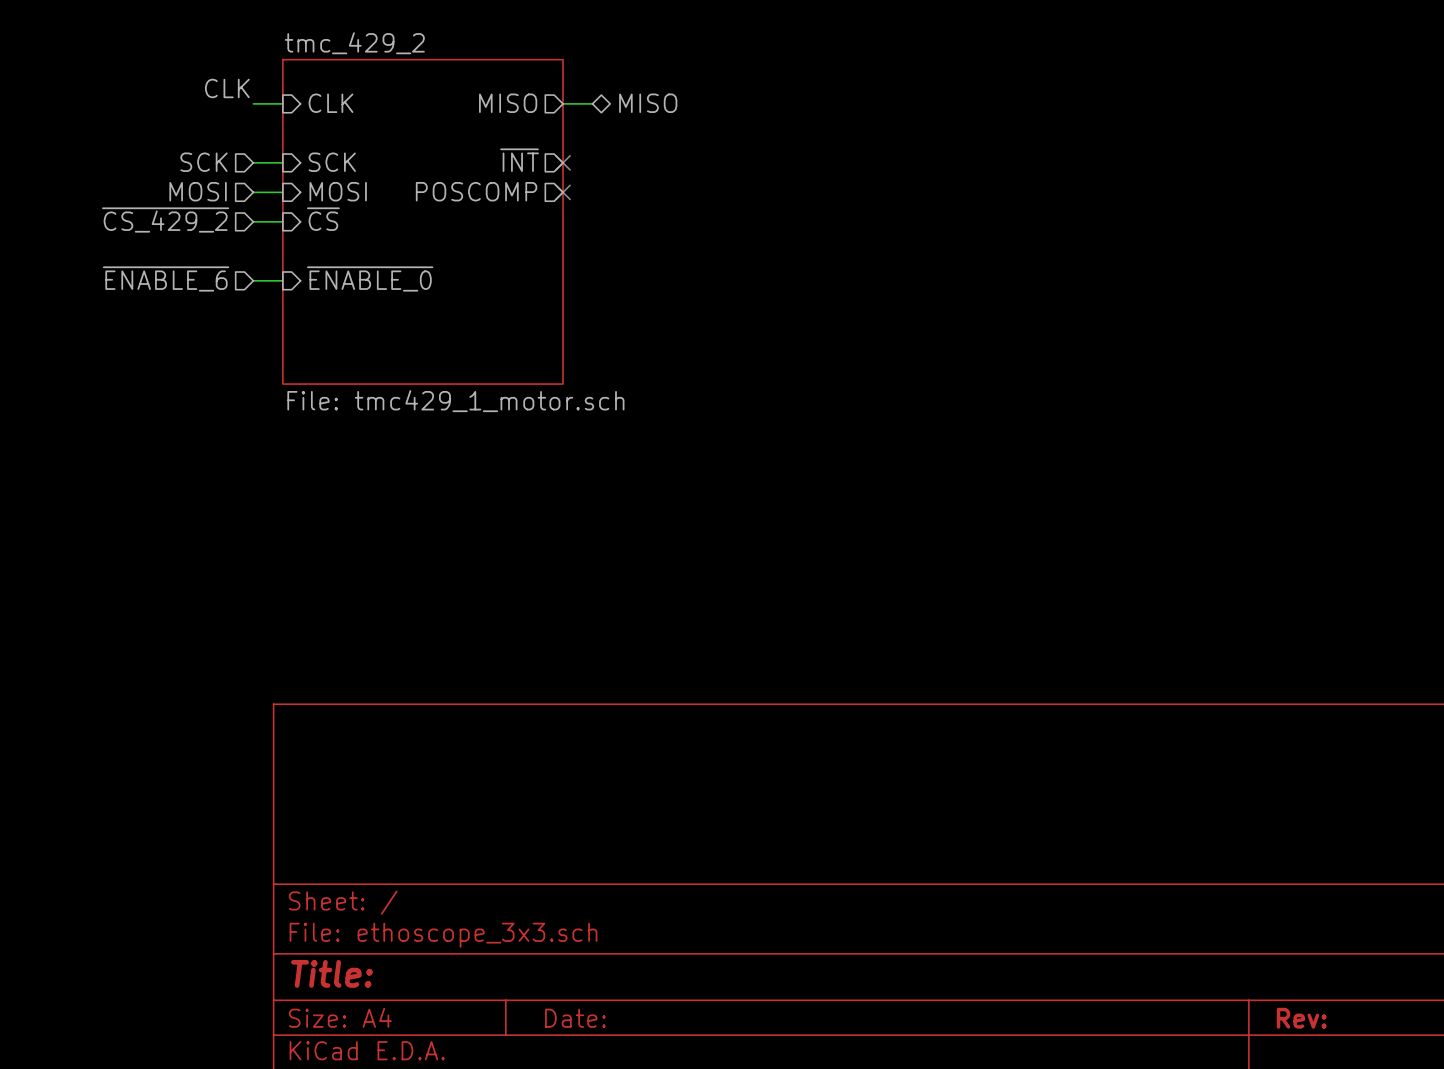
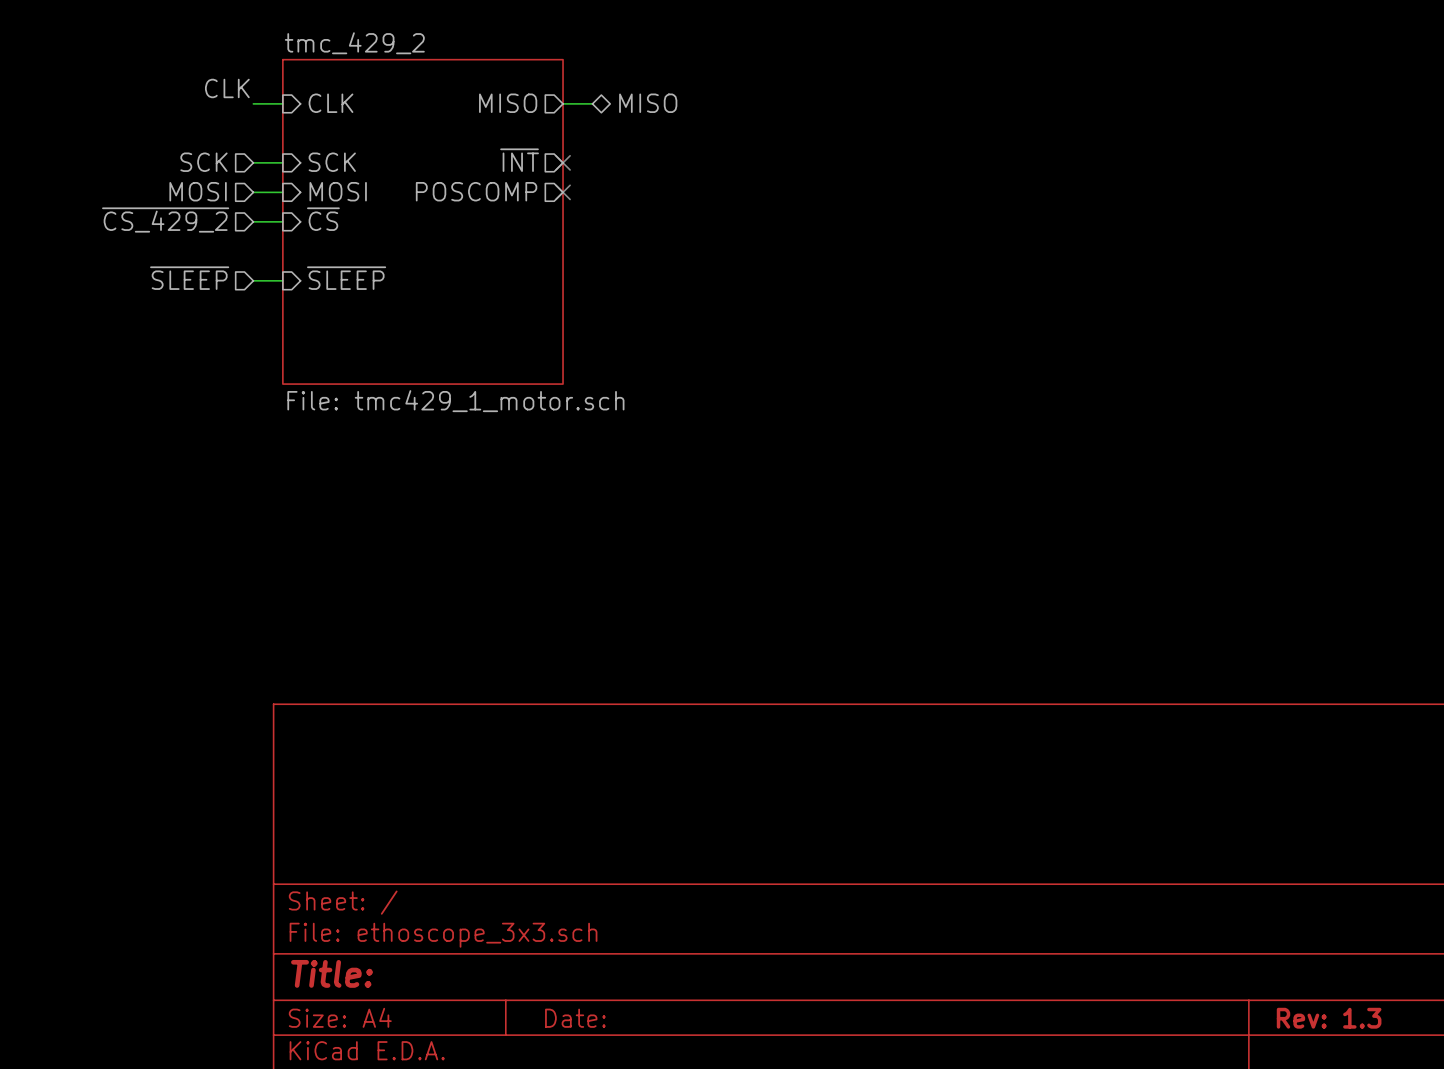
hierarchical label: ~{ENABLE_6} (166, 278) -> ~{SLEEP} (189, 278)
sheet pin: ~{ENABLE_0} (370, 278) -> ~{SLEEP} (346, 278)
title block: Rev: (1301, 1018) -> Rev: 1.3 (1329, 1018)

